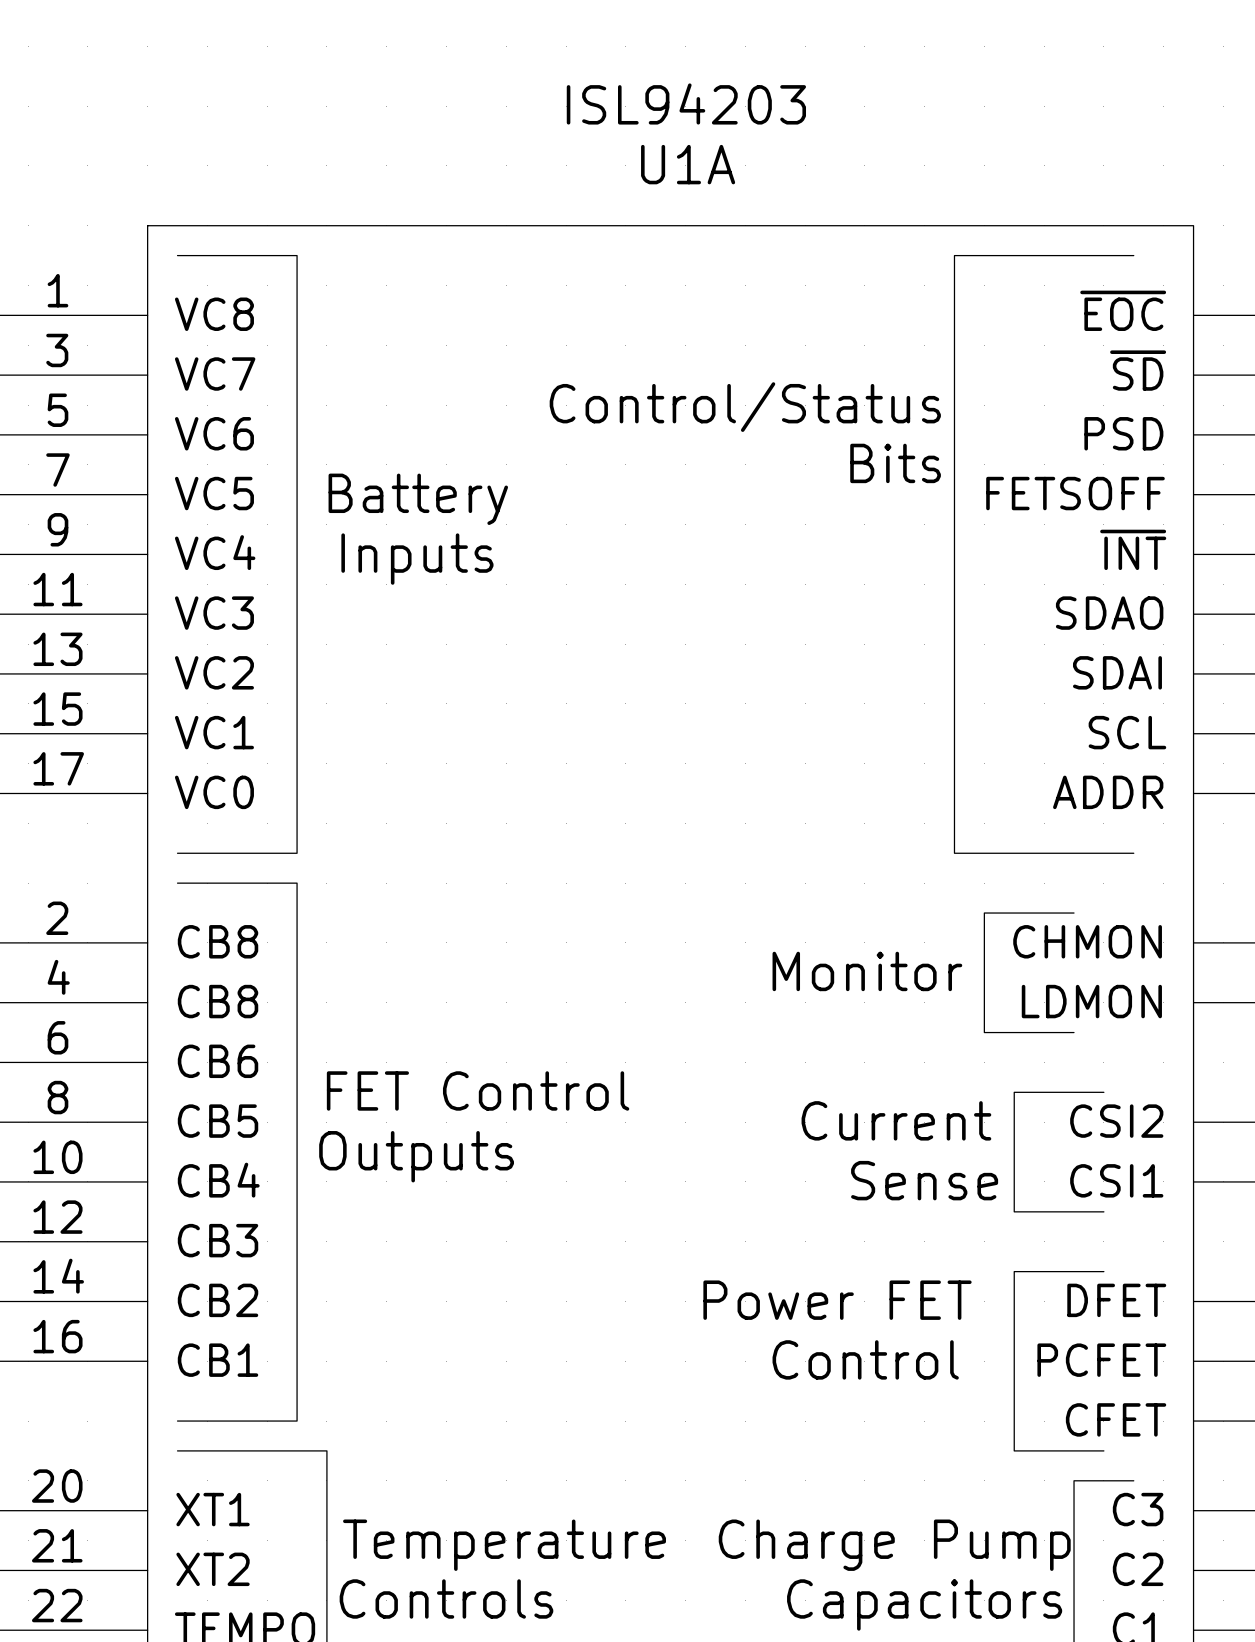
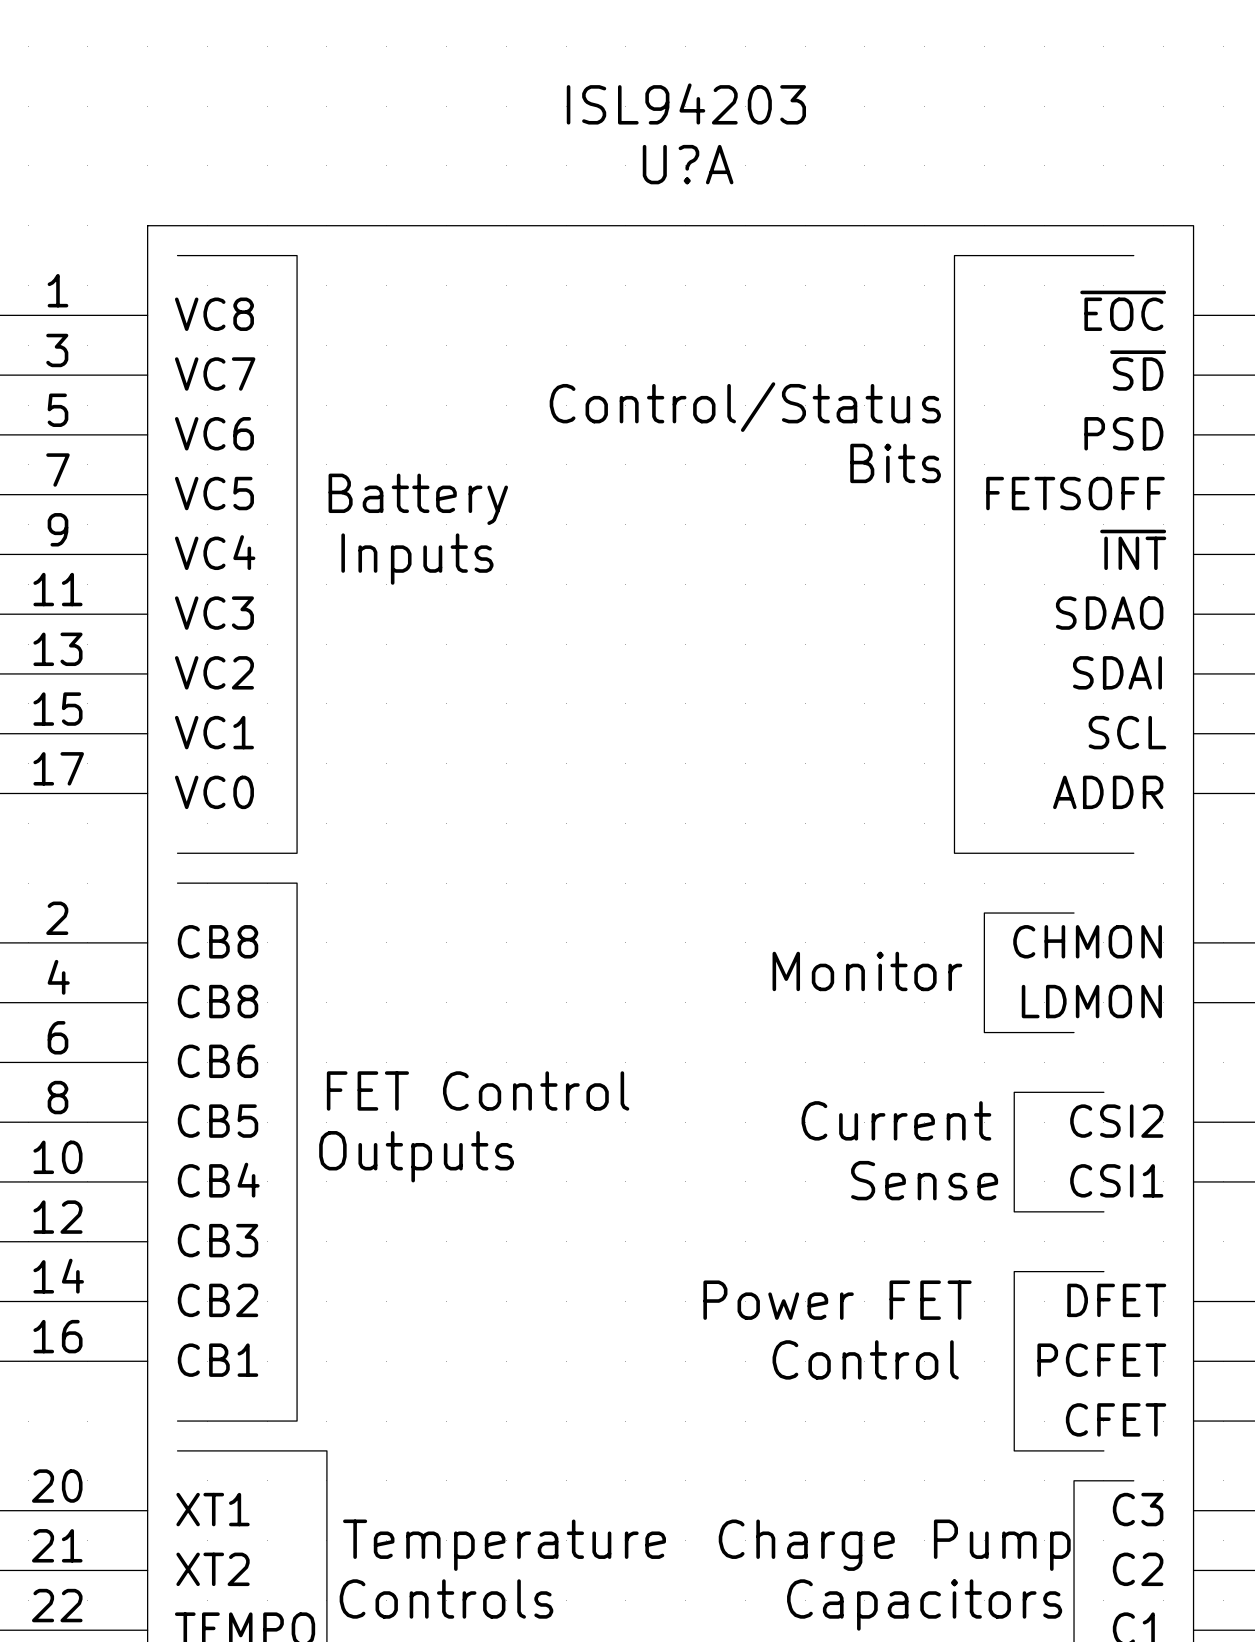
U1A name: U1A (688, 164) -> U?A (688, 164)

